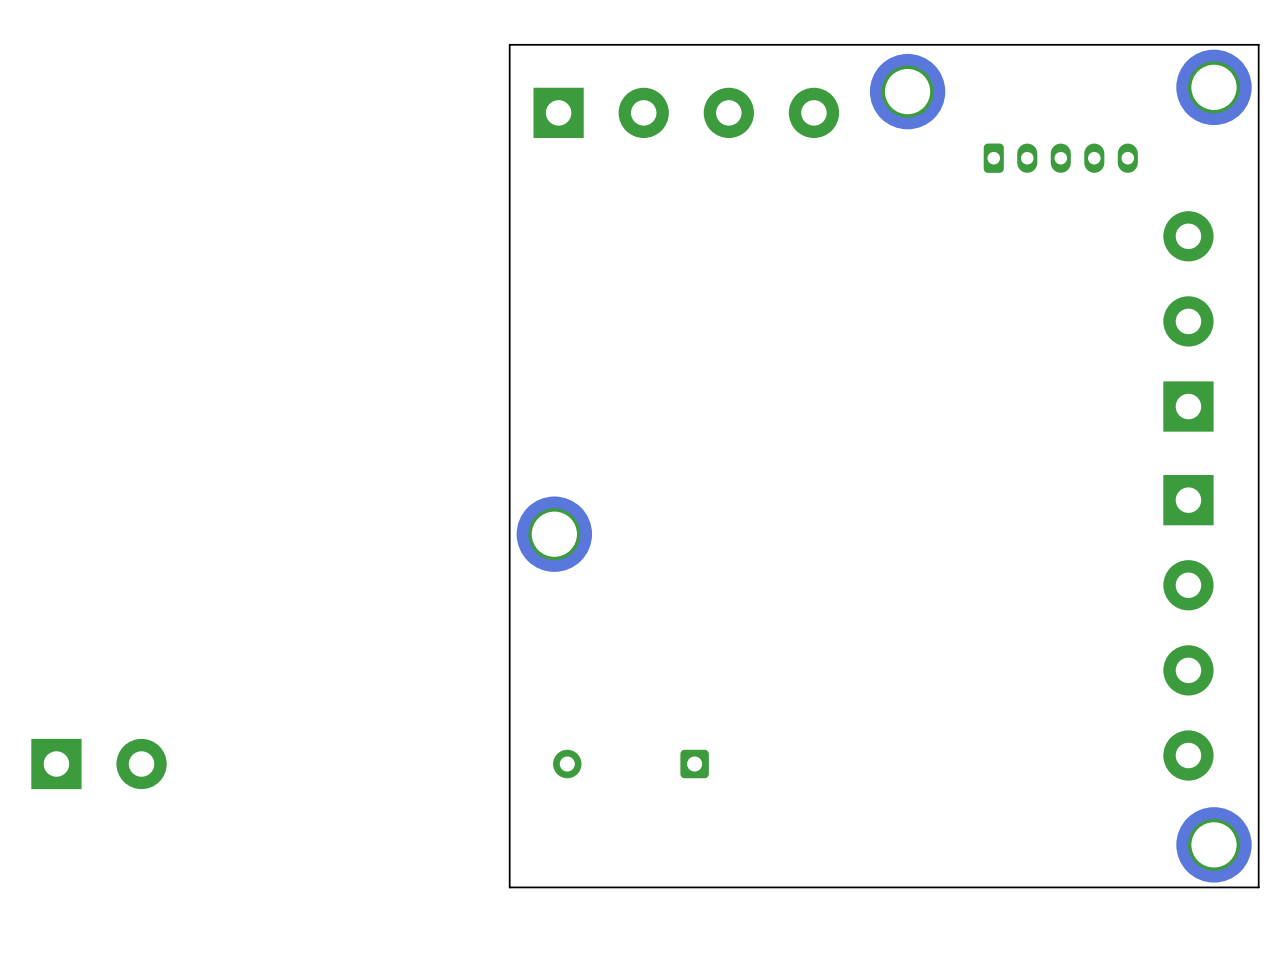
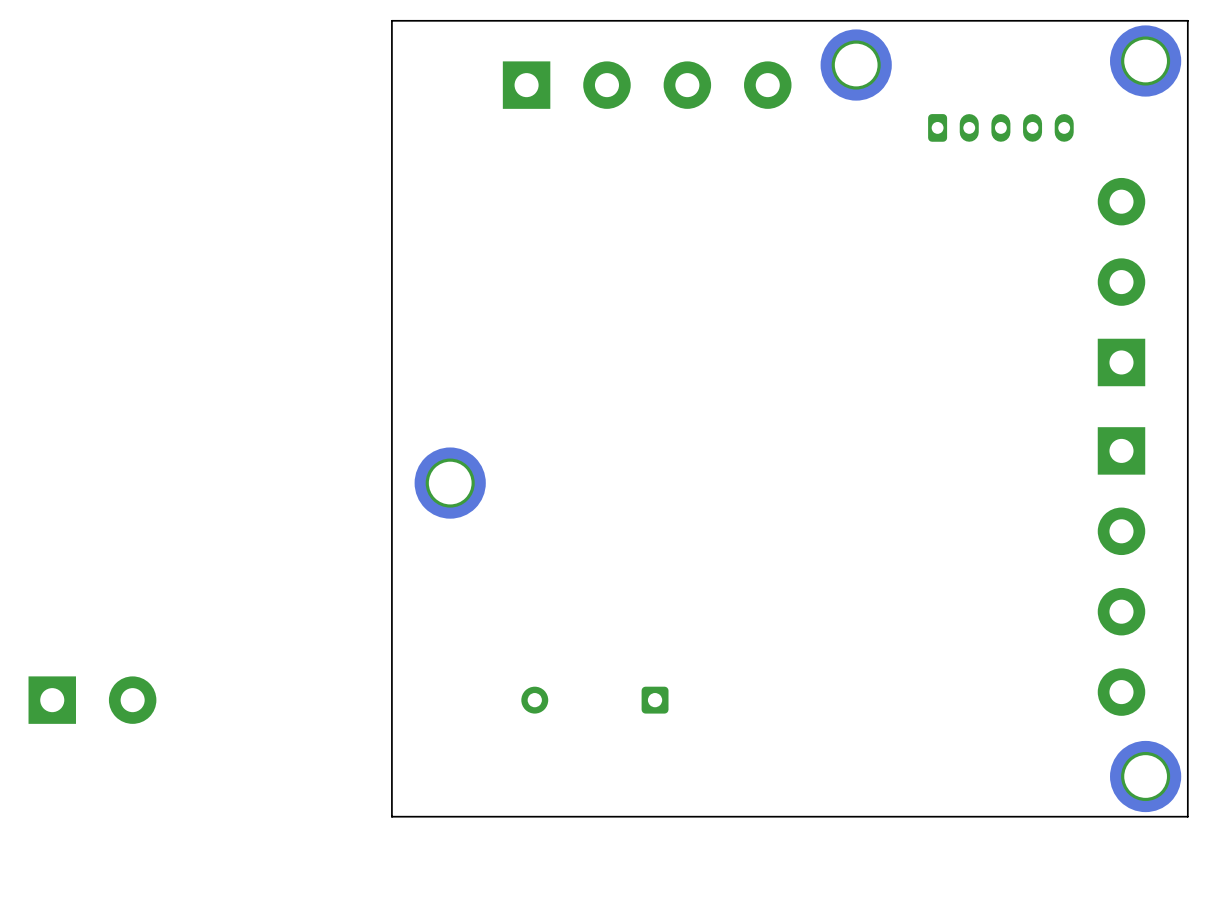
board edge: (509, 44) (509, 887) -> (480, 20) (391, 20) (391, 816) (480, 816)
part position: (554, 534) -> (450, 483)

